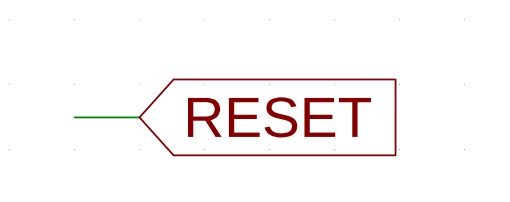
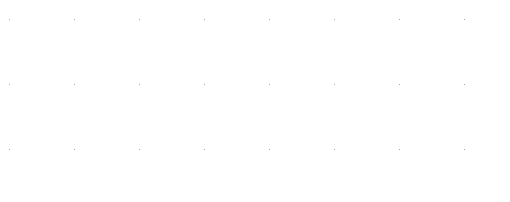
wire: (74, 117) (139, 117) -> none
global label: RESET (279, 117) -> none

